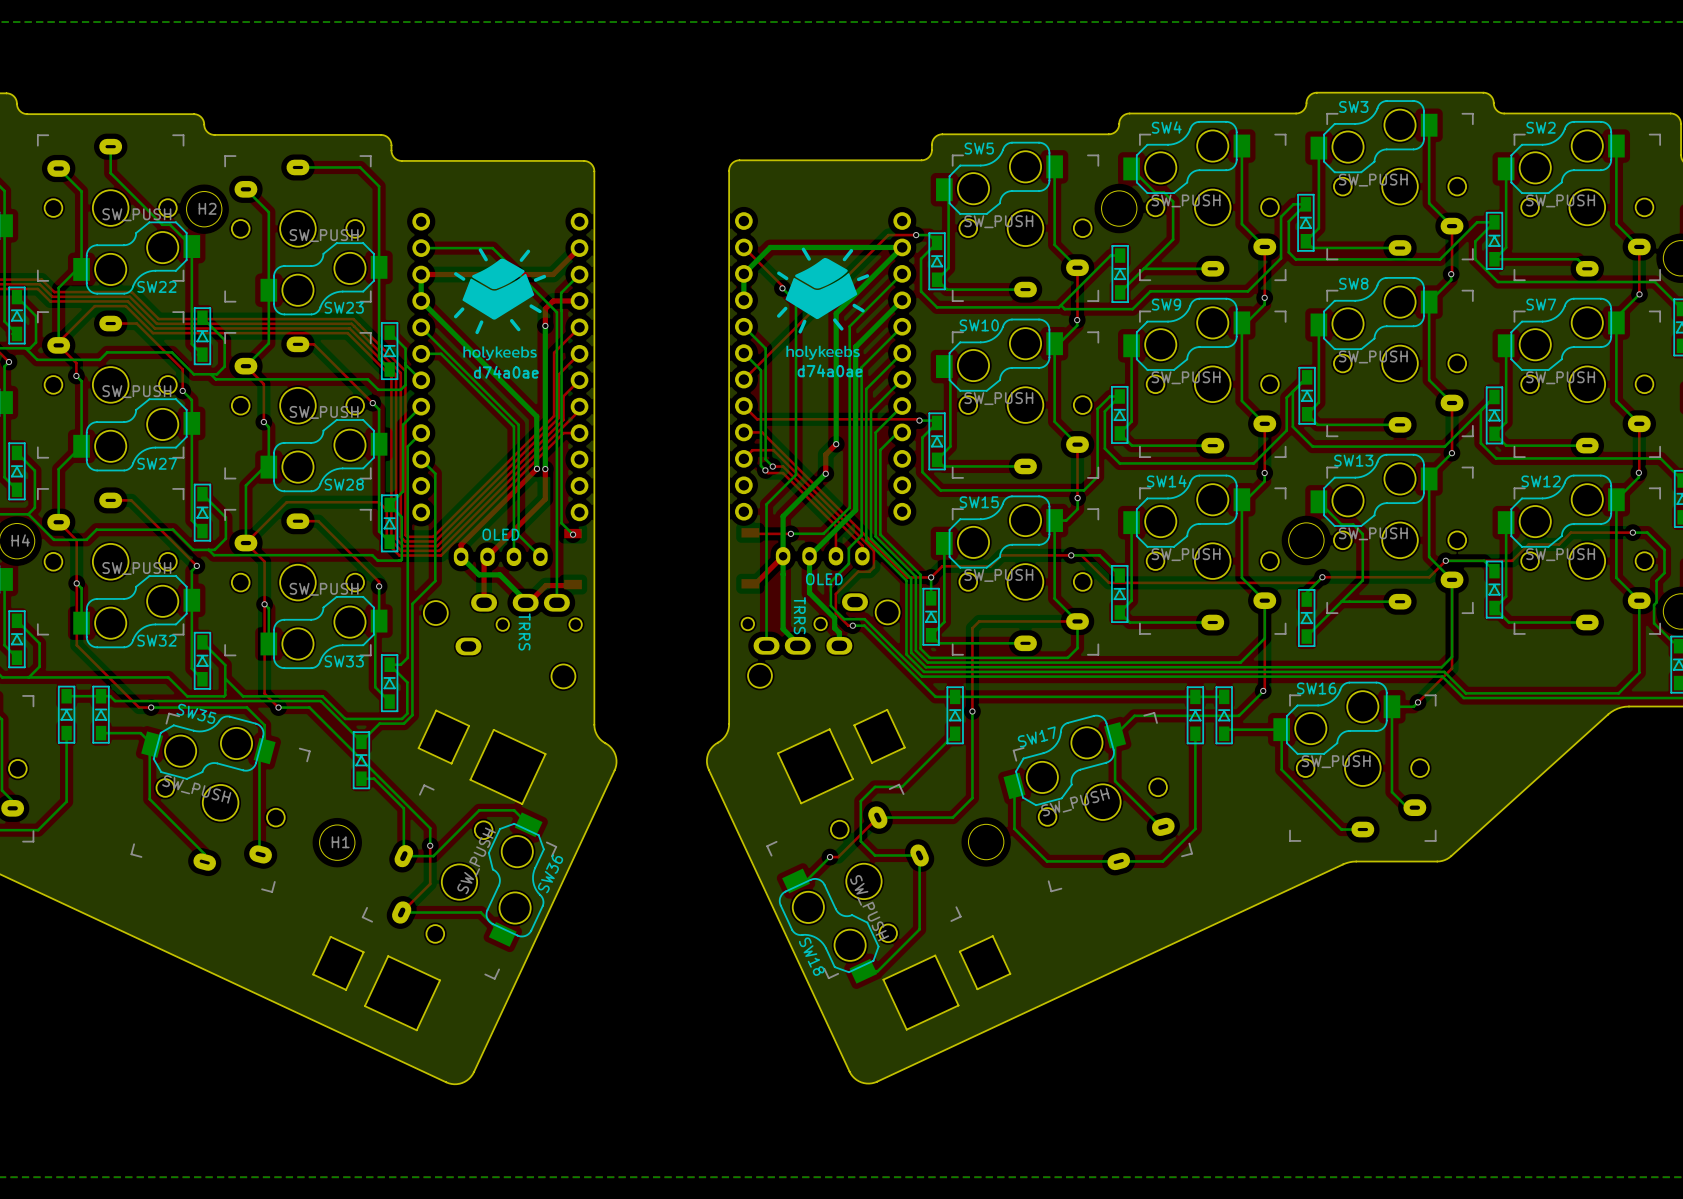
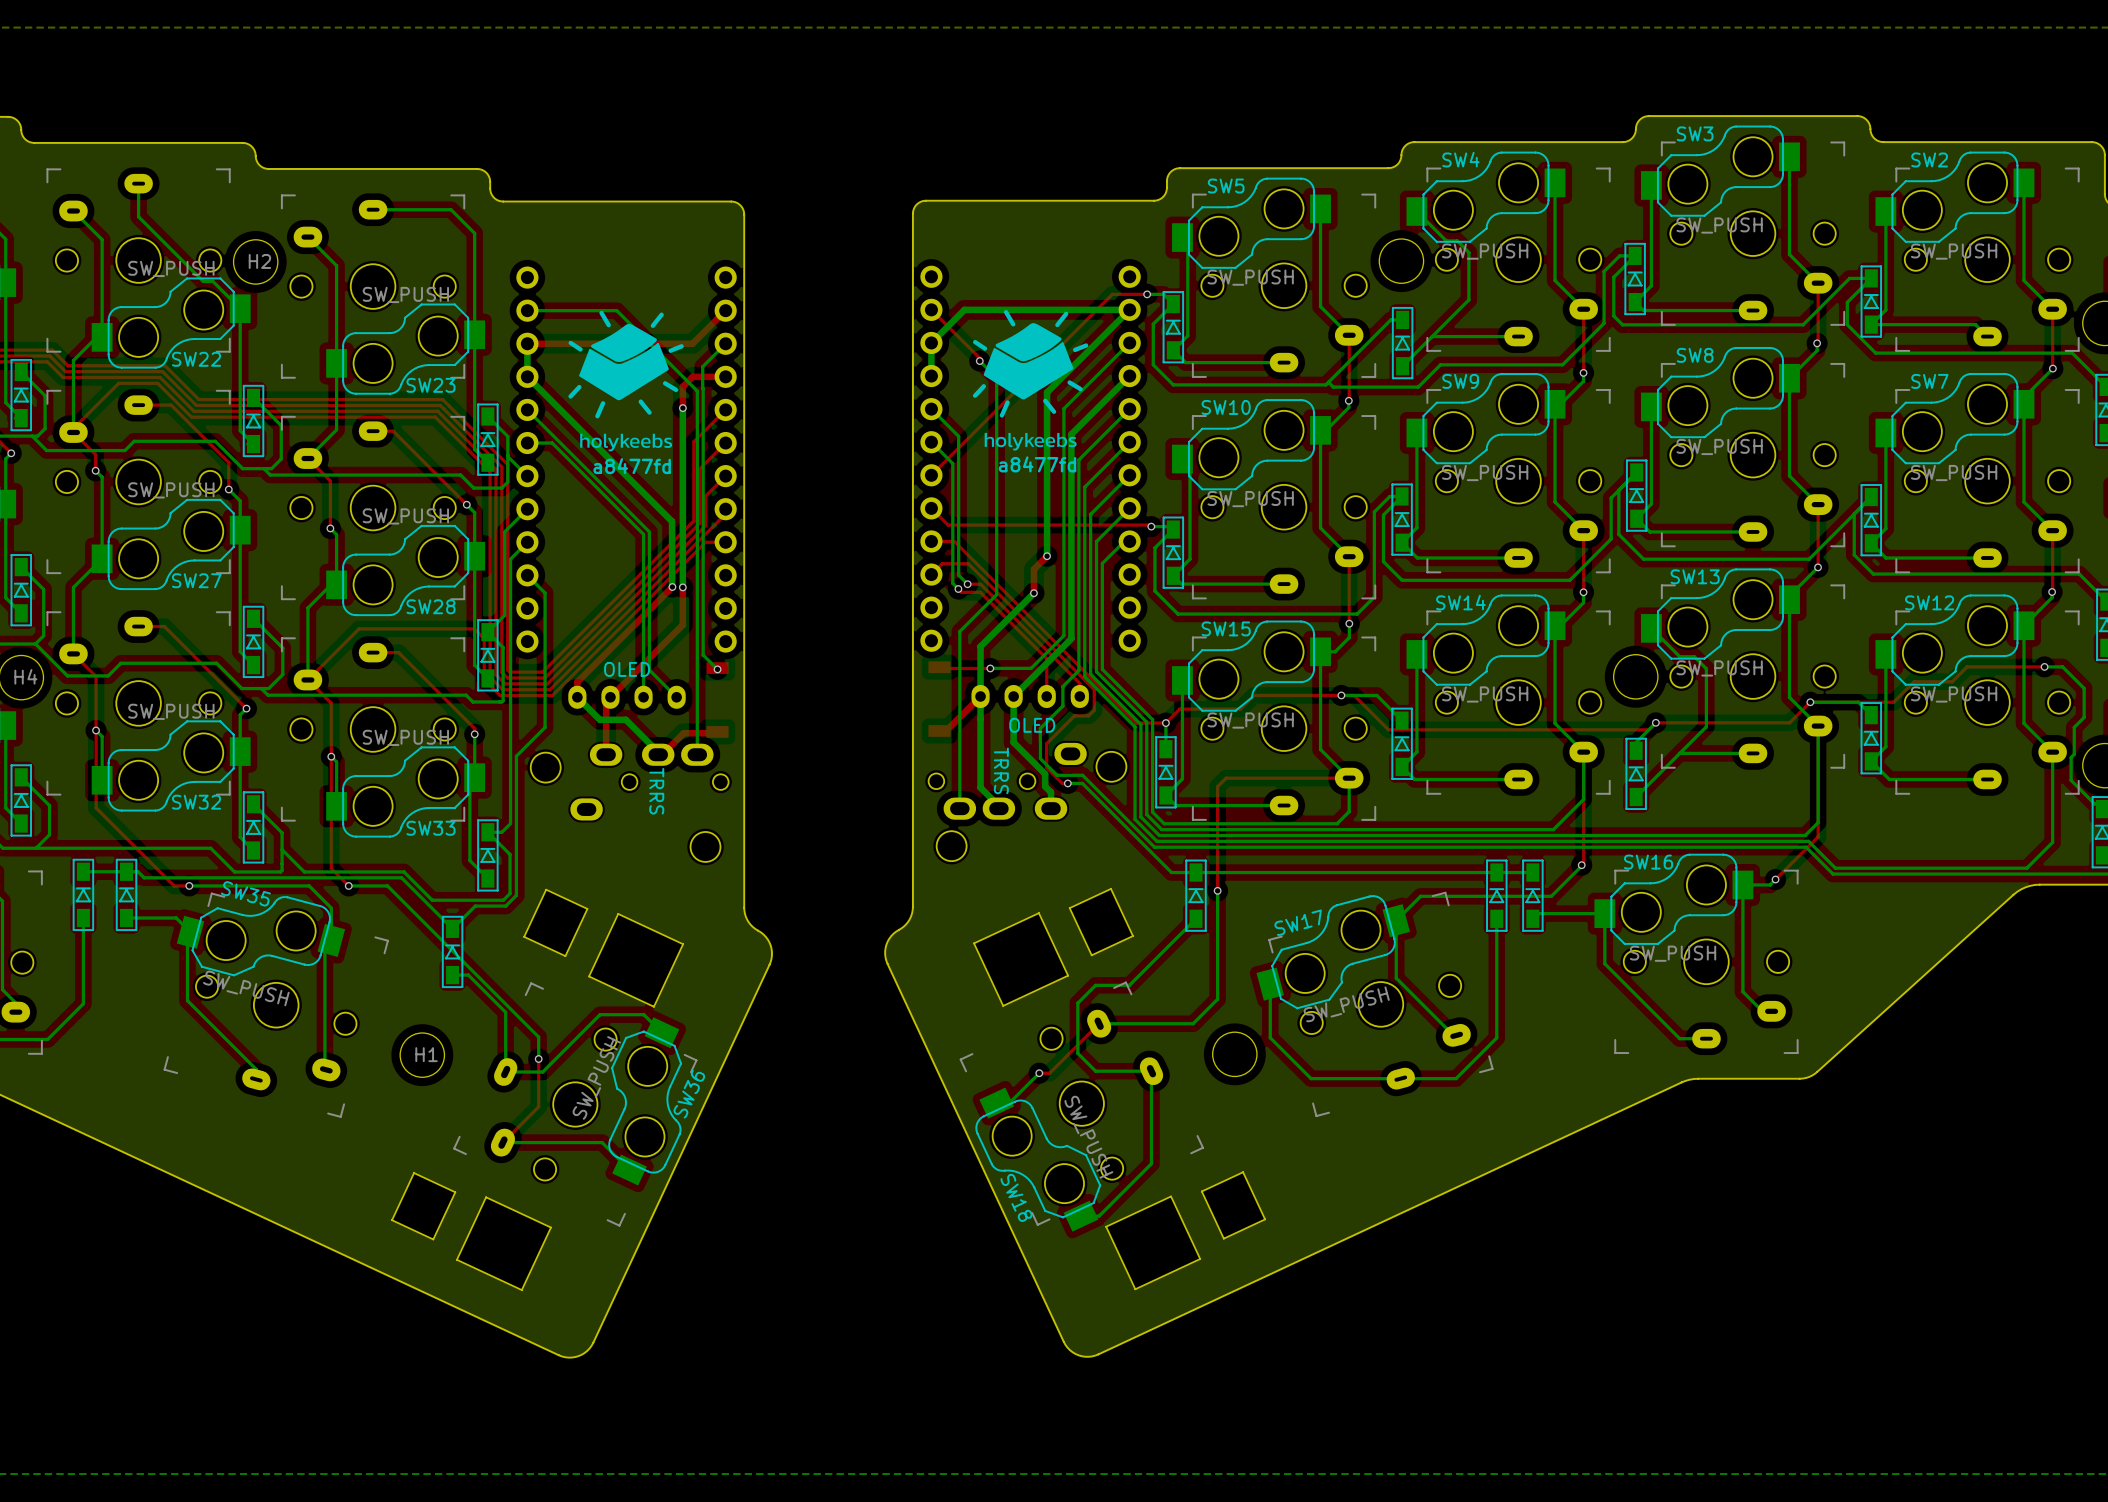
text: d74a0ae (830, 370) -> a8477fd (1037, 464)
text: d74a0ae (506, 372) -> a8477fd (632, 466)

